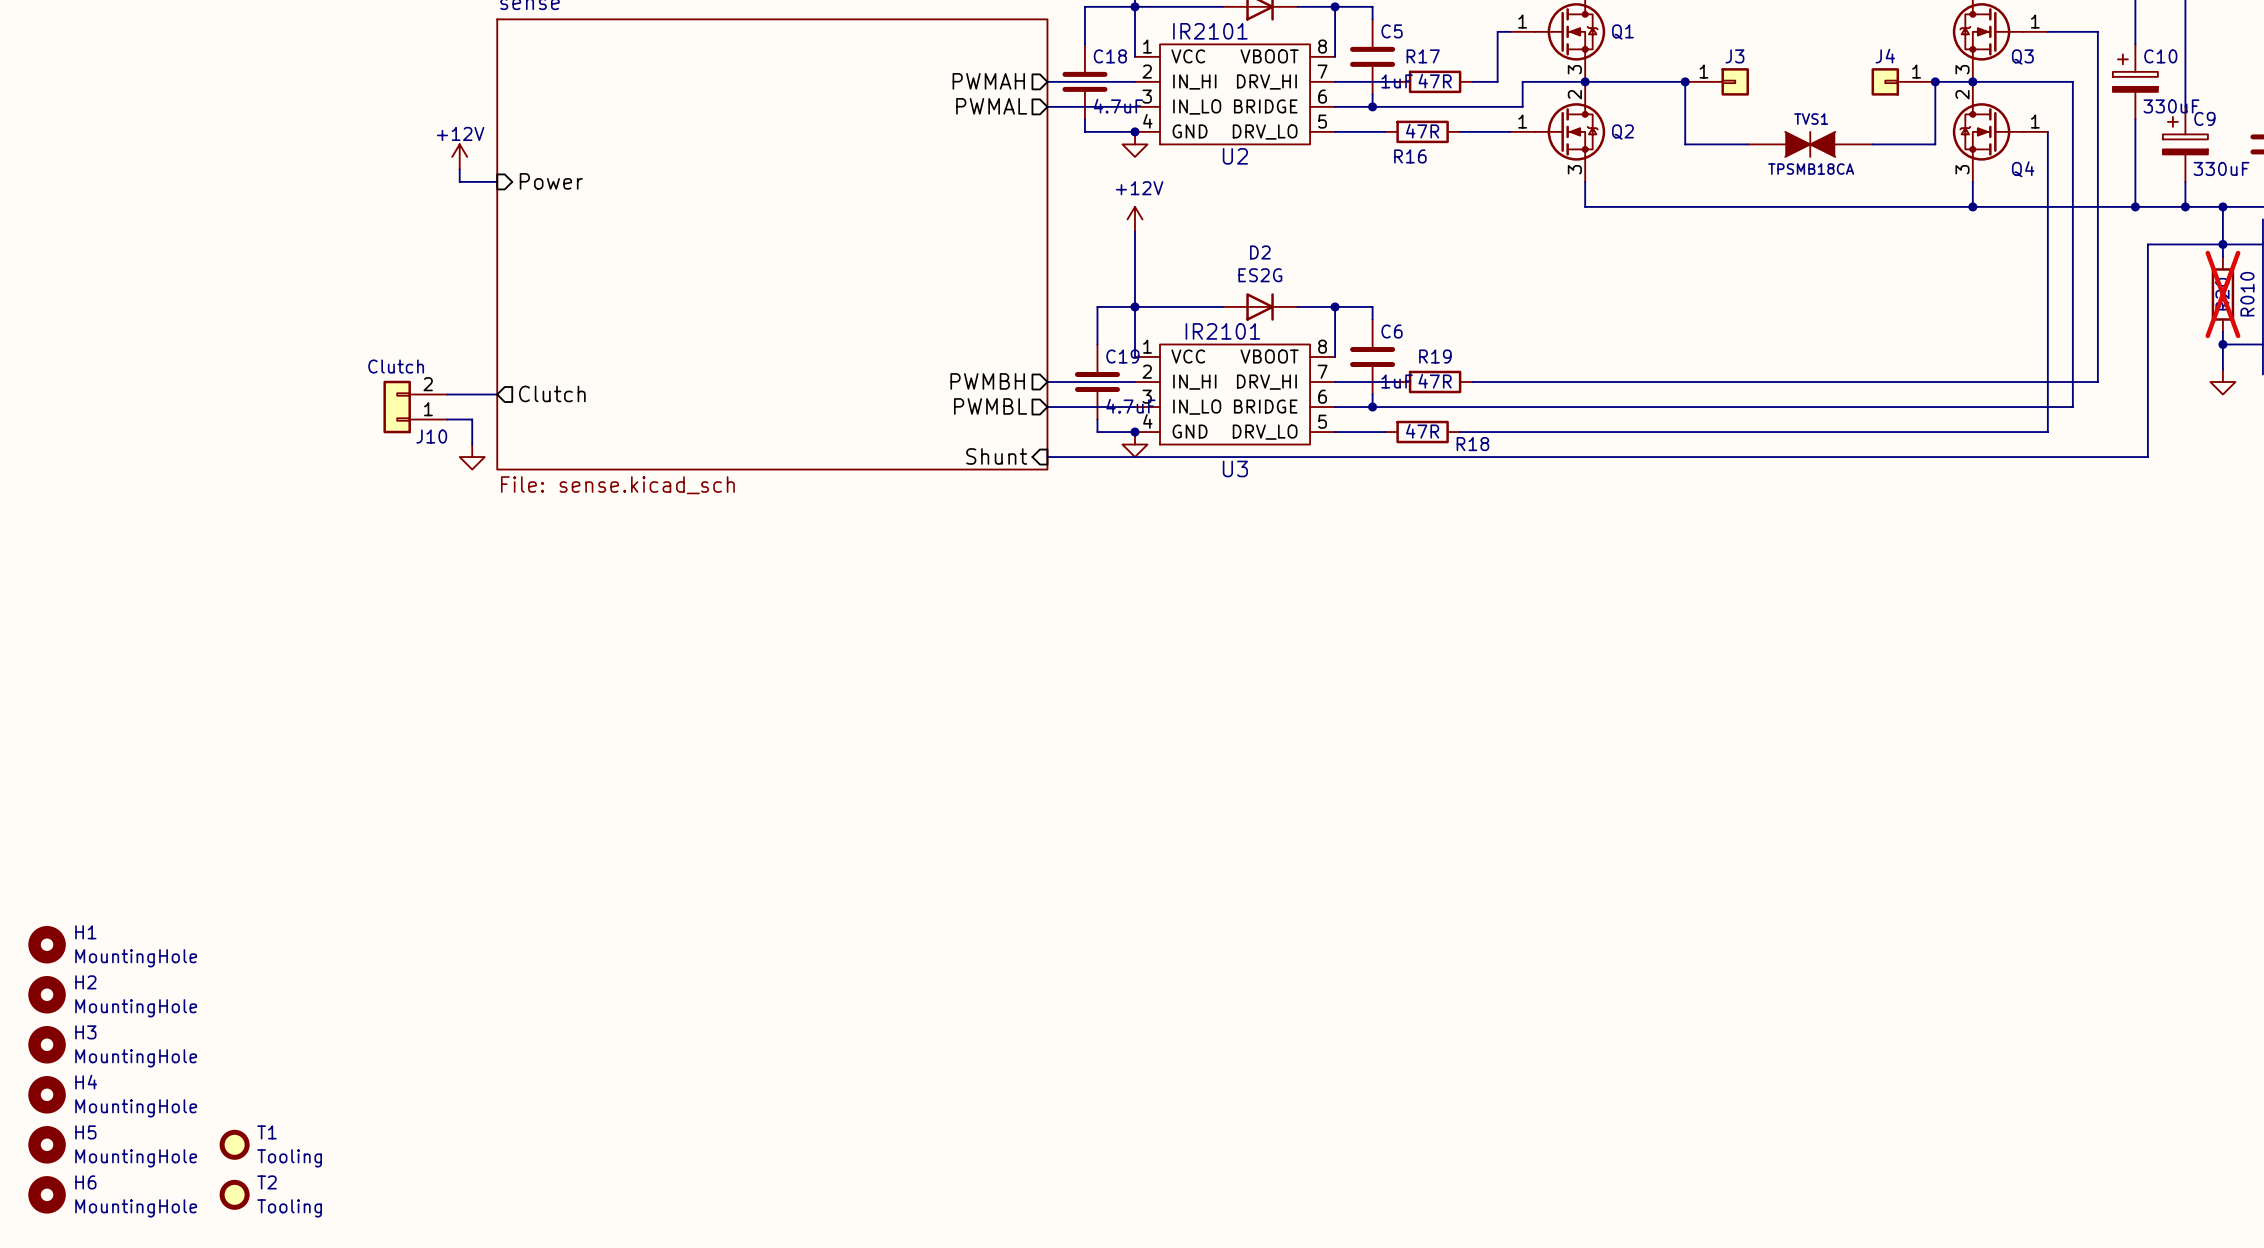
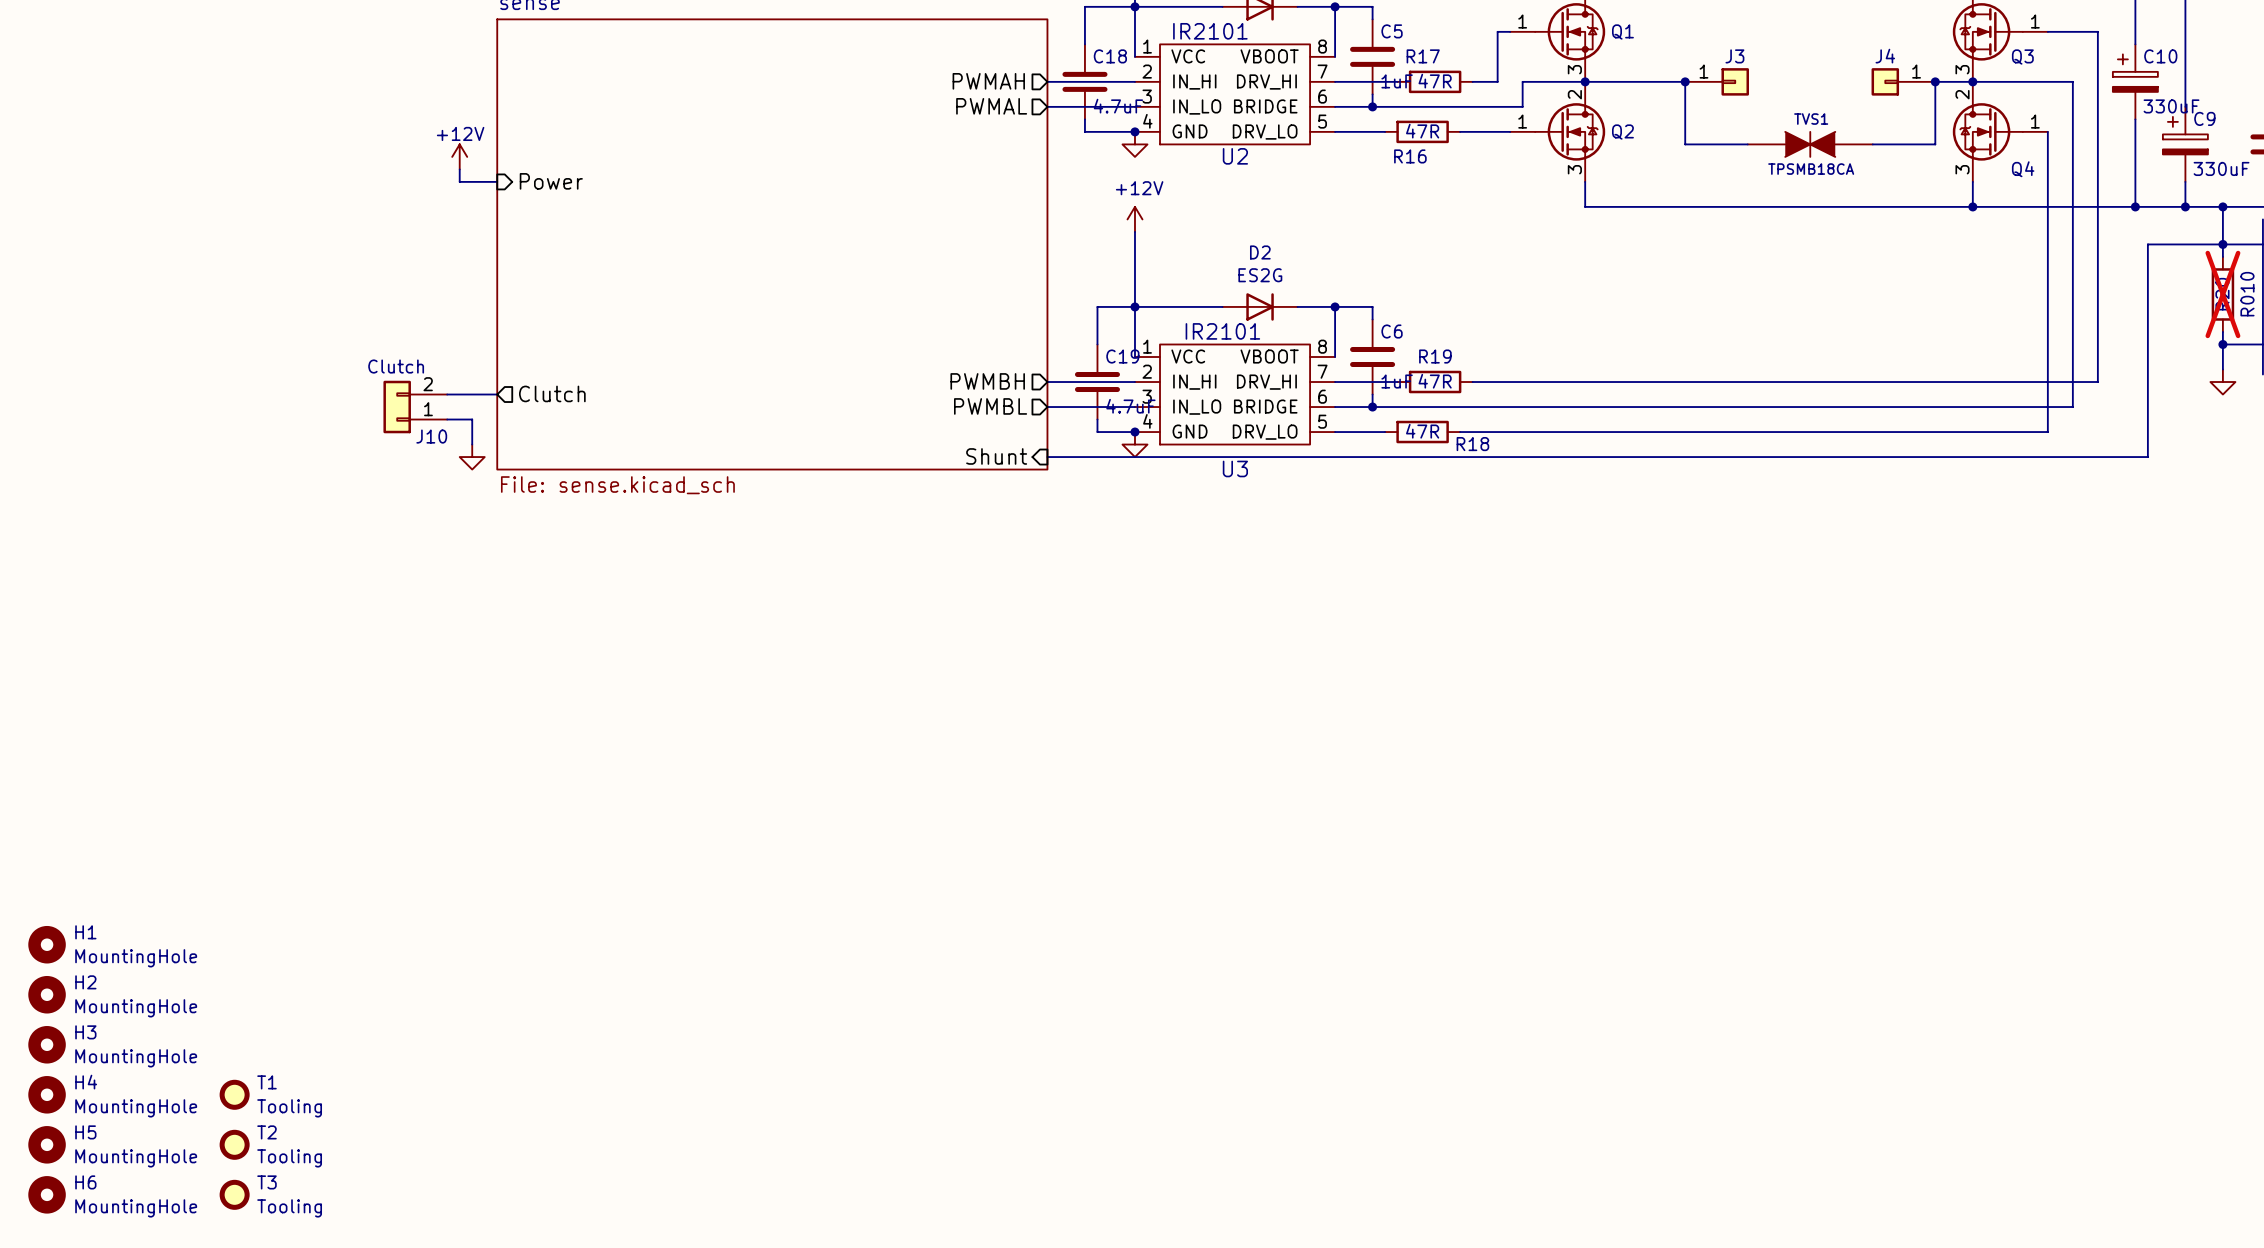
T1: none -> Tooling (234, 1094)
T1 name: T1 (266, 1132) -> T2 (266, 1132)
T2 name: T2 (266, 1182) -> T3 (266, 1182)

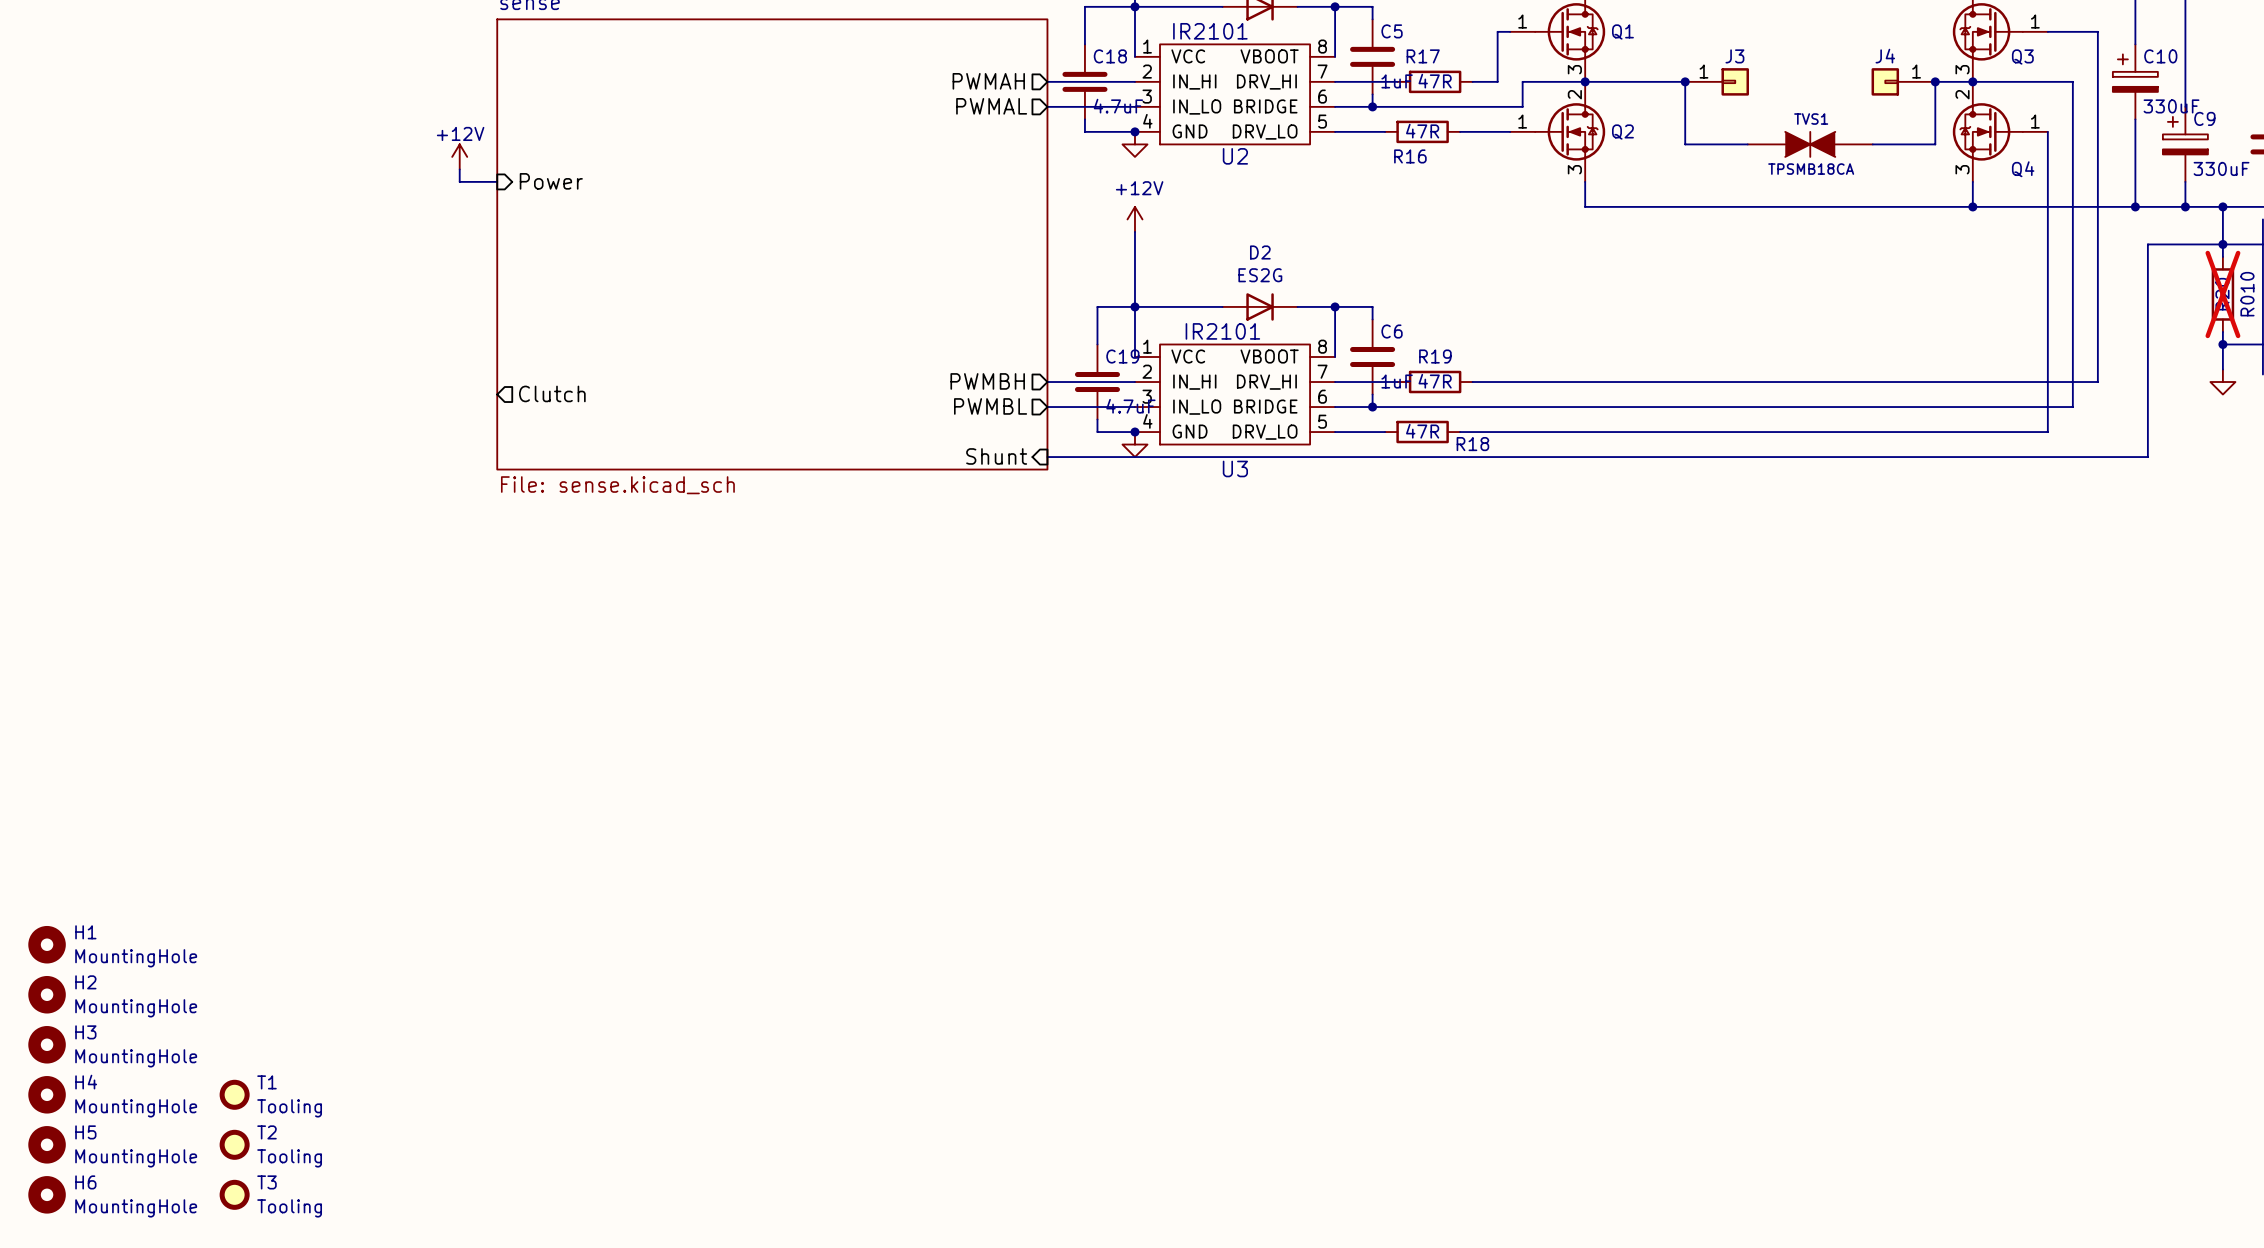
wire: (447, 394) (497, 394) -> none
J10: Clutch (415, 407) -> none
wire: (447, 419) (472, 419) (472, 444) -> none
power symbol: (472, 457) -> none

